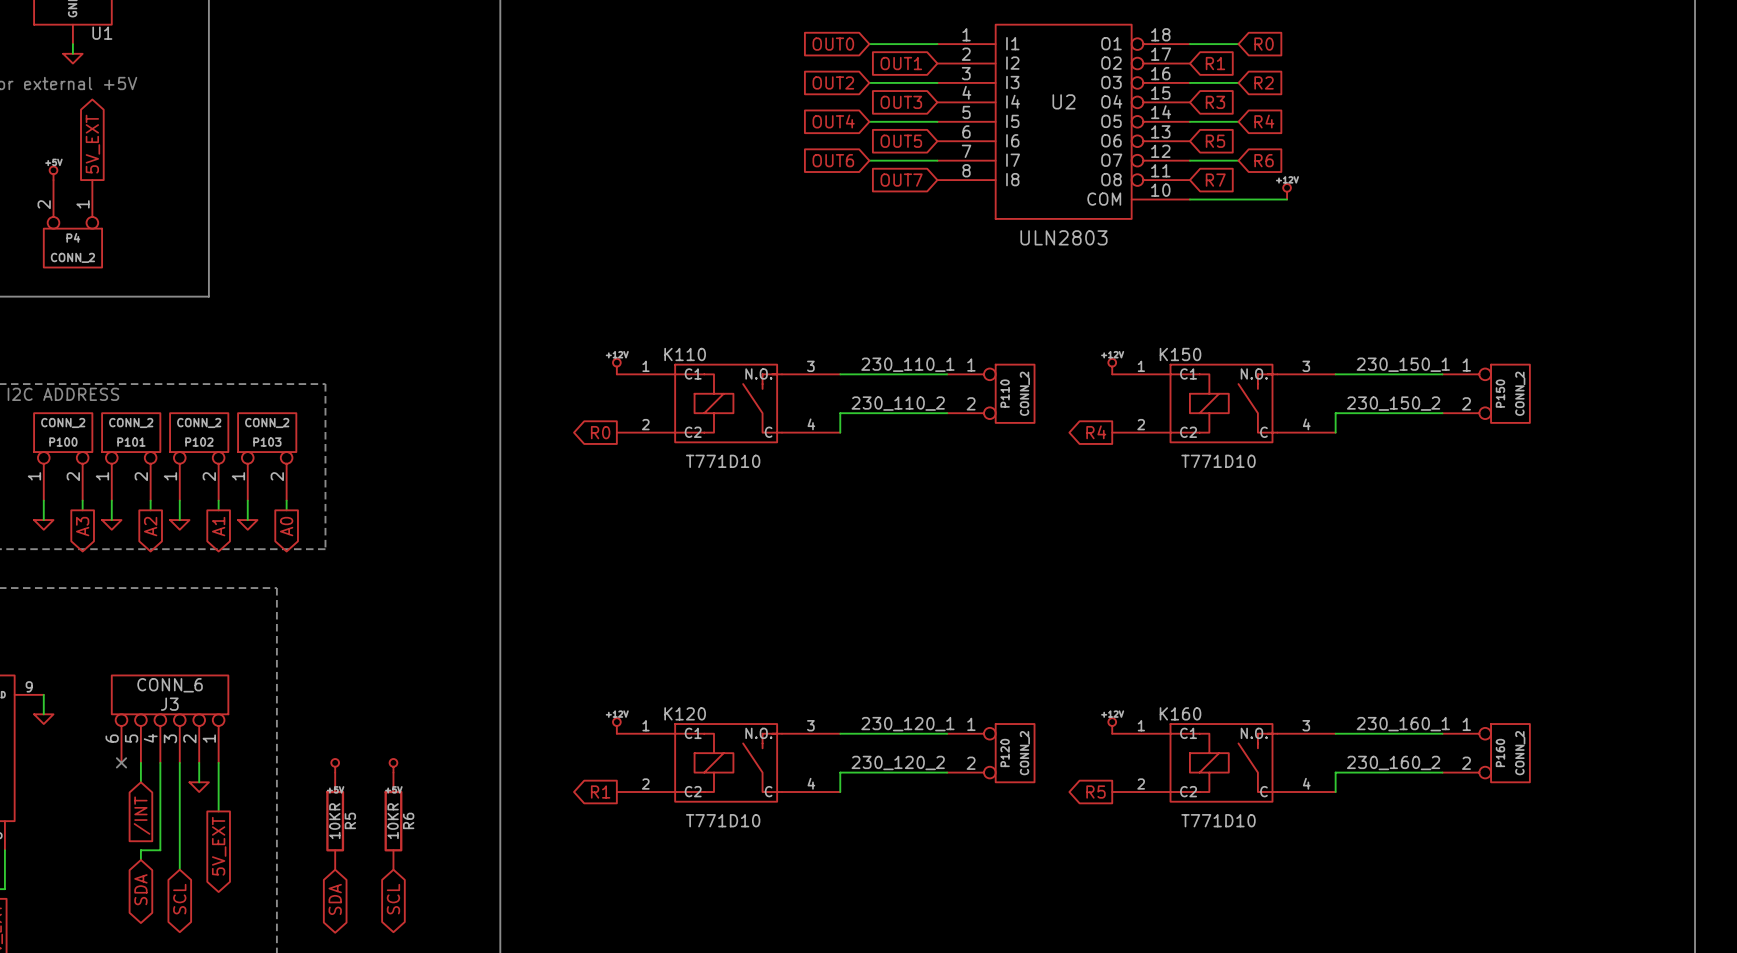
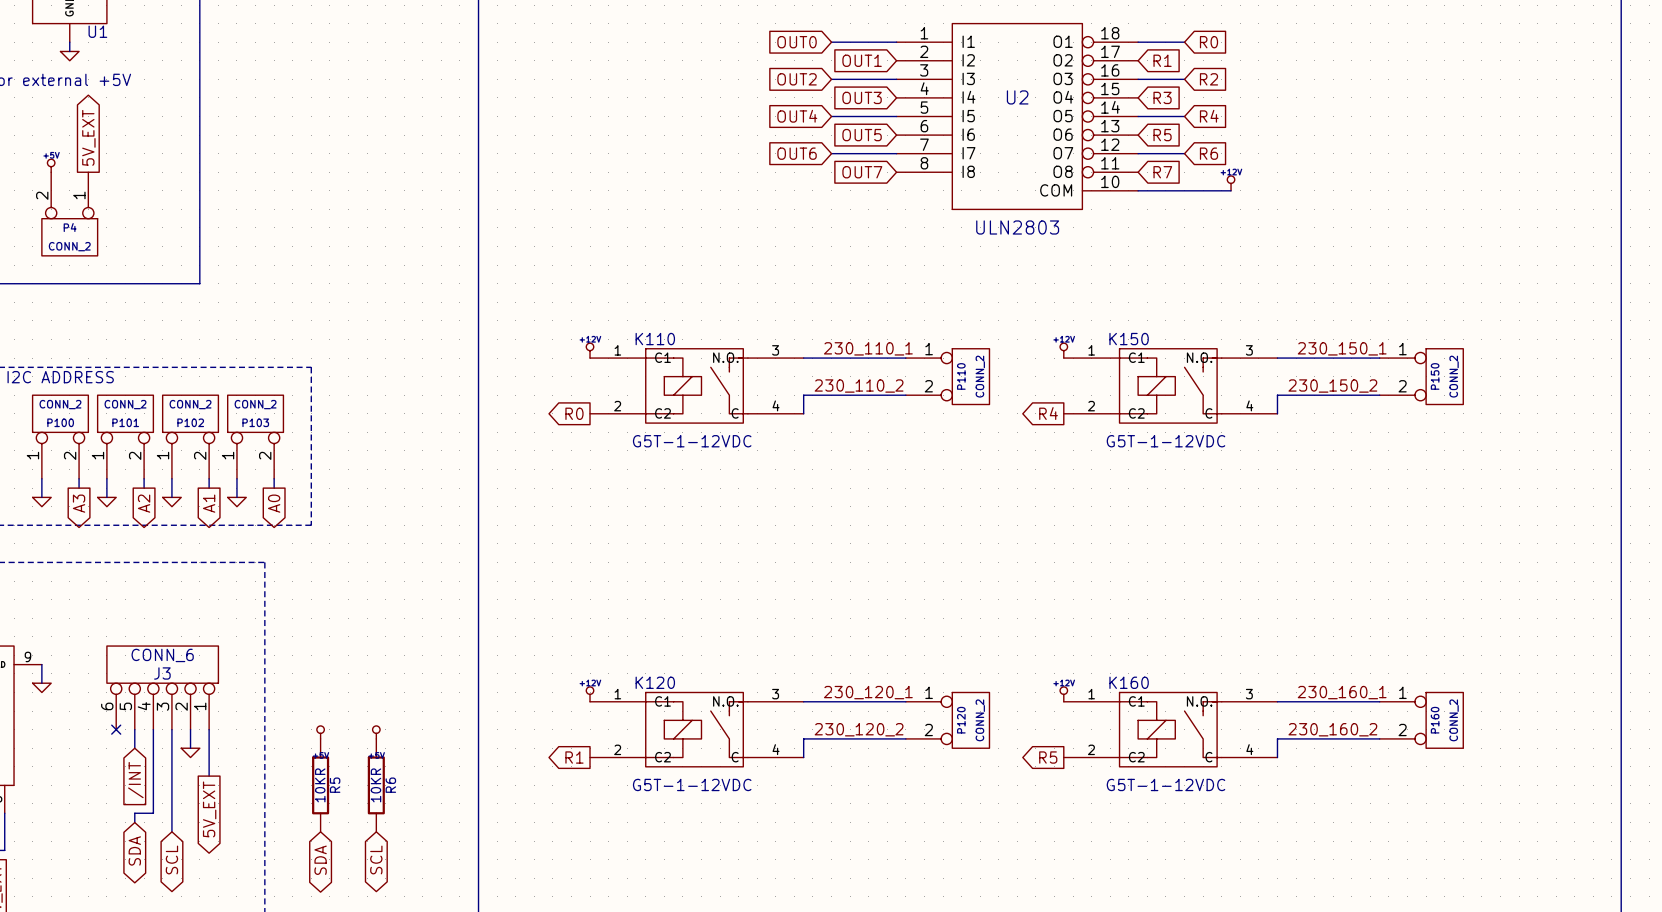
K110 value: T771D10 (723, 461) -> G5T-1-12VDC (692, 441)
K150 value: T771D10 (1218, 461) -> G5T-1-12VDC (1165, 441)
K120 value: T771D10 (723, 820) -> G5T-1-12VDC (692, 784)
K160 value: T771D10 (1218, 820) -> G5T-1-12VDC (1165, 784)

